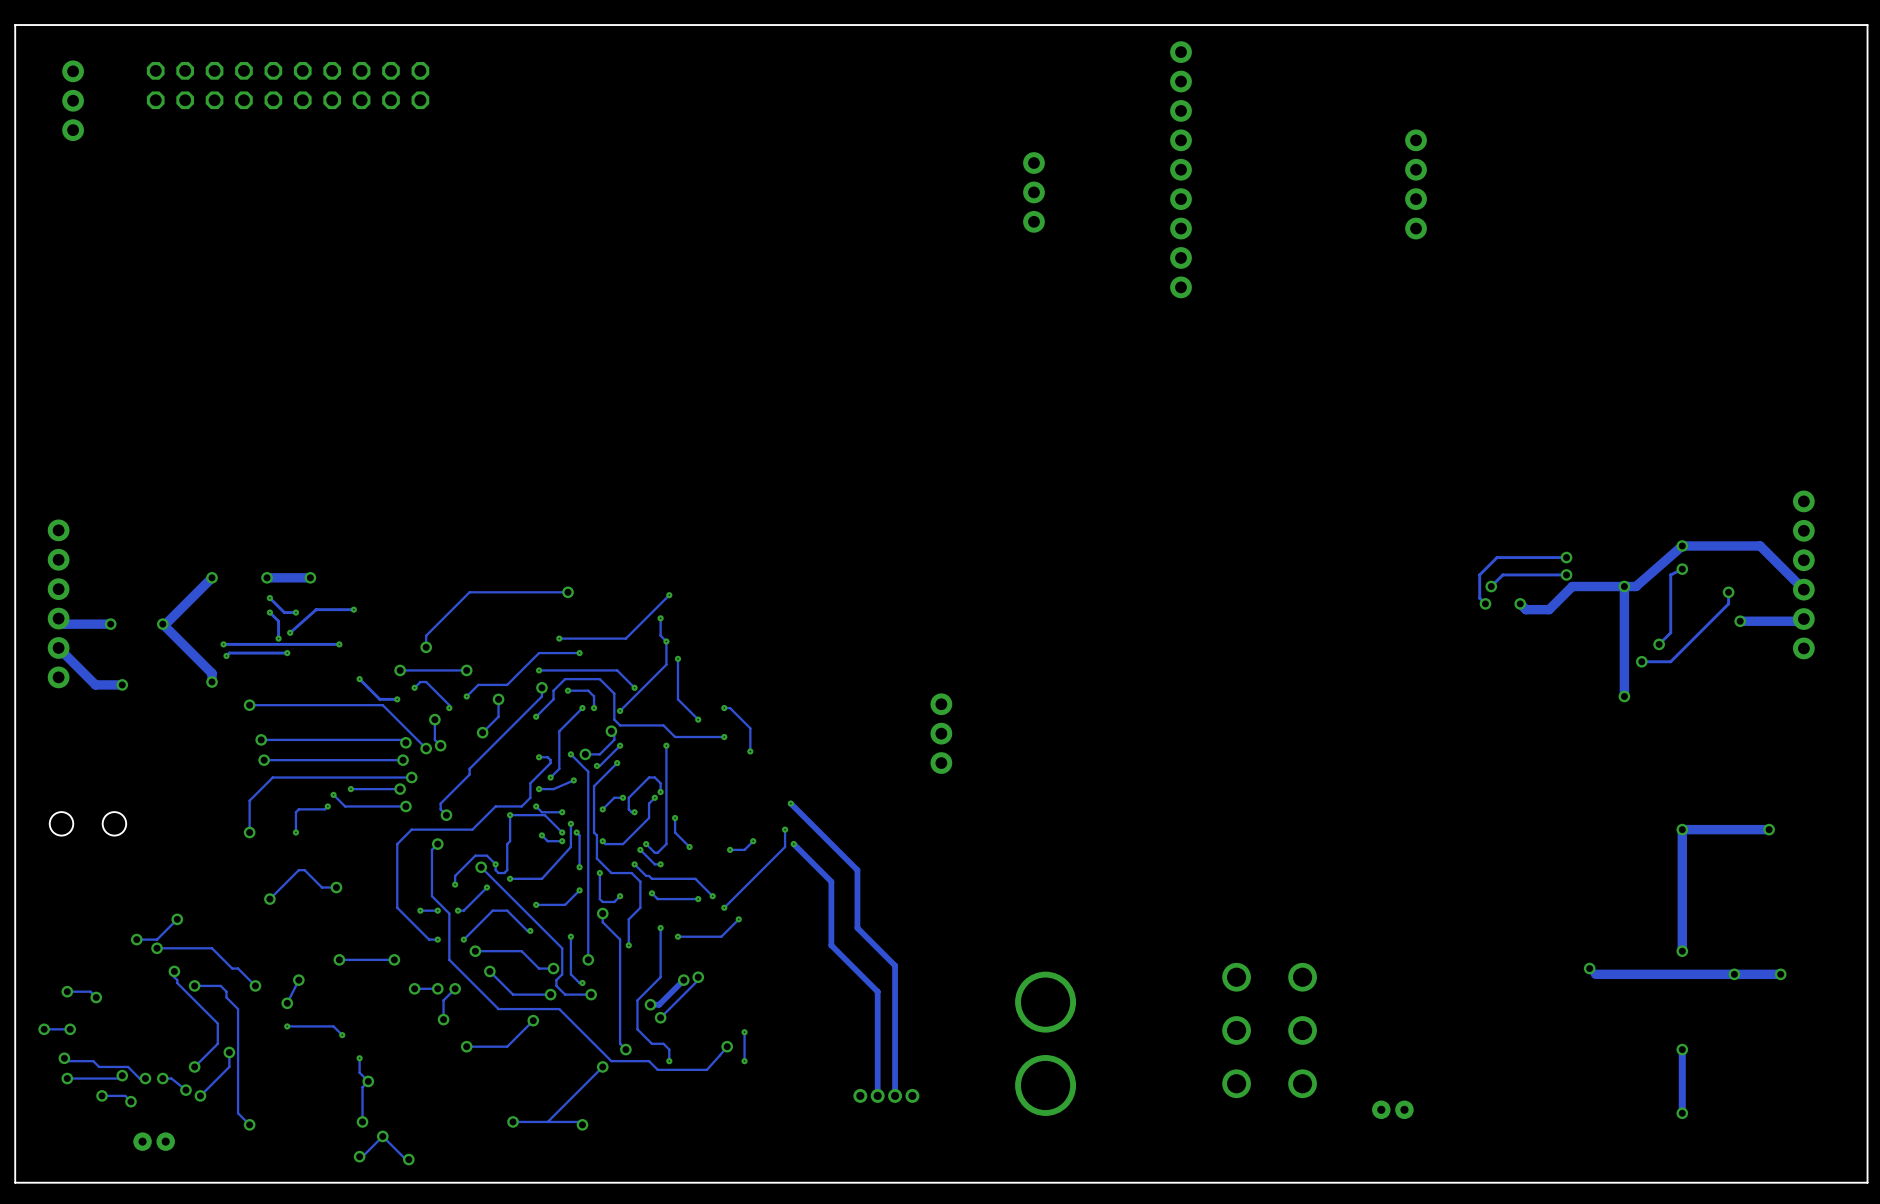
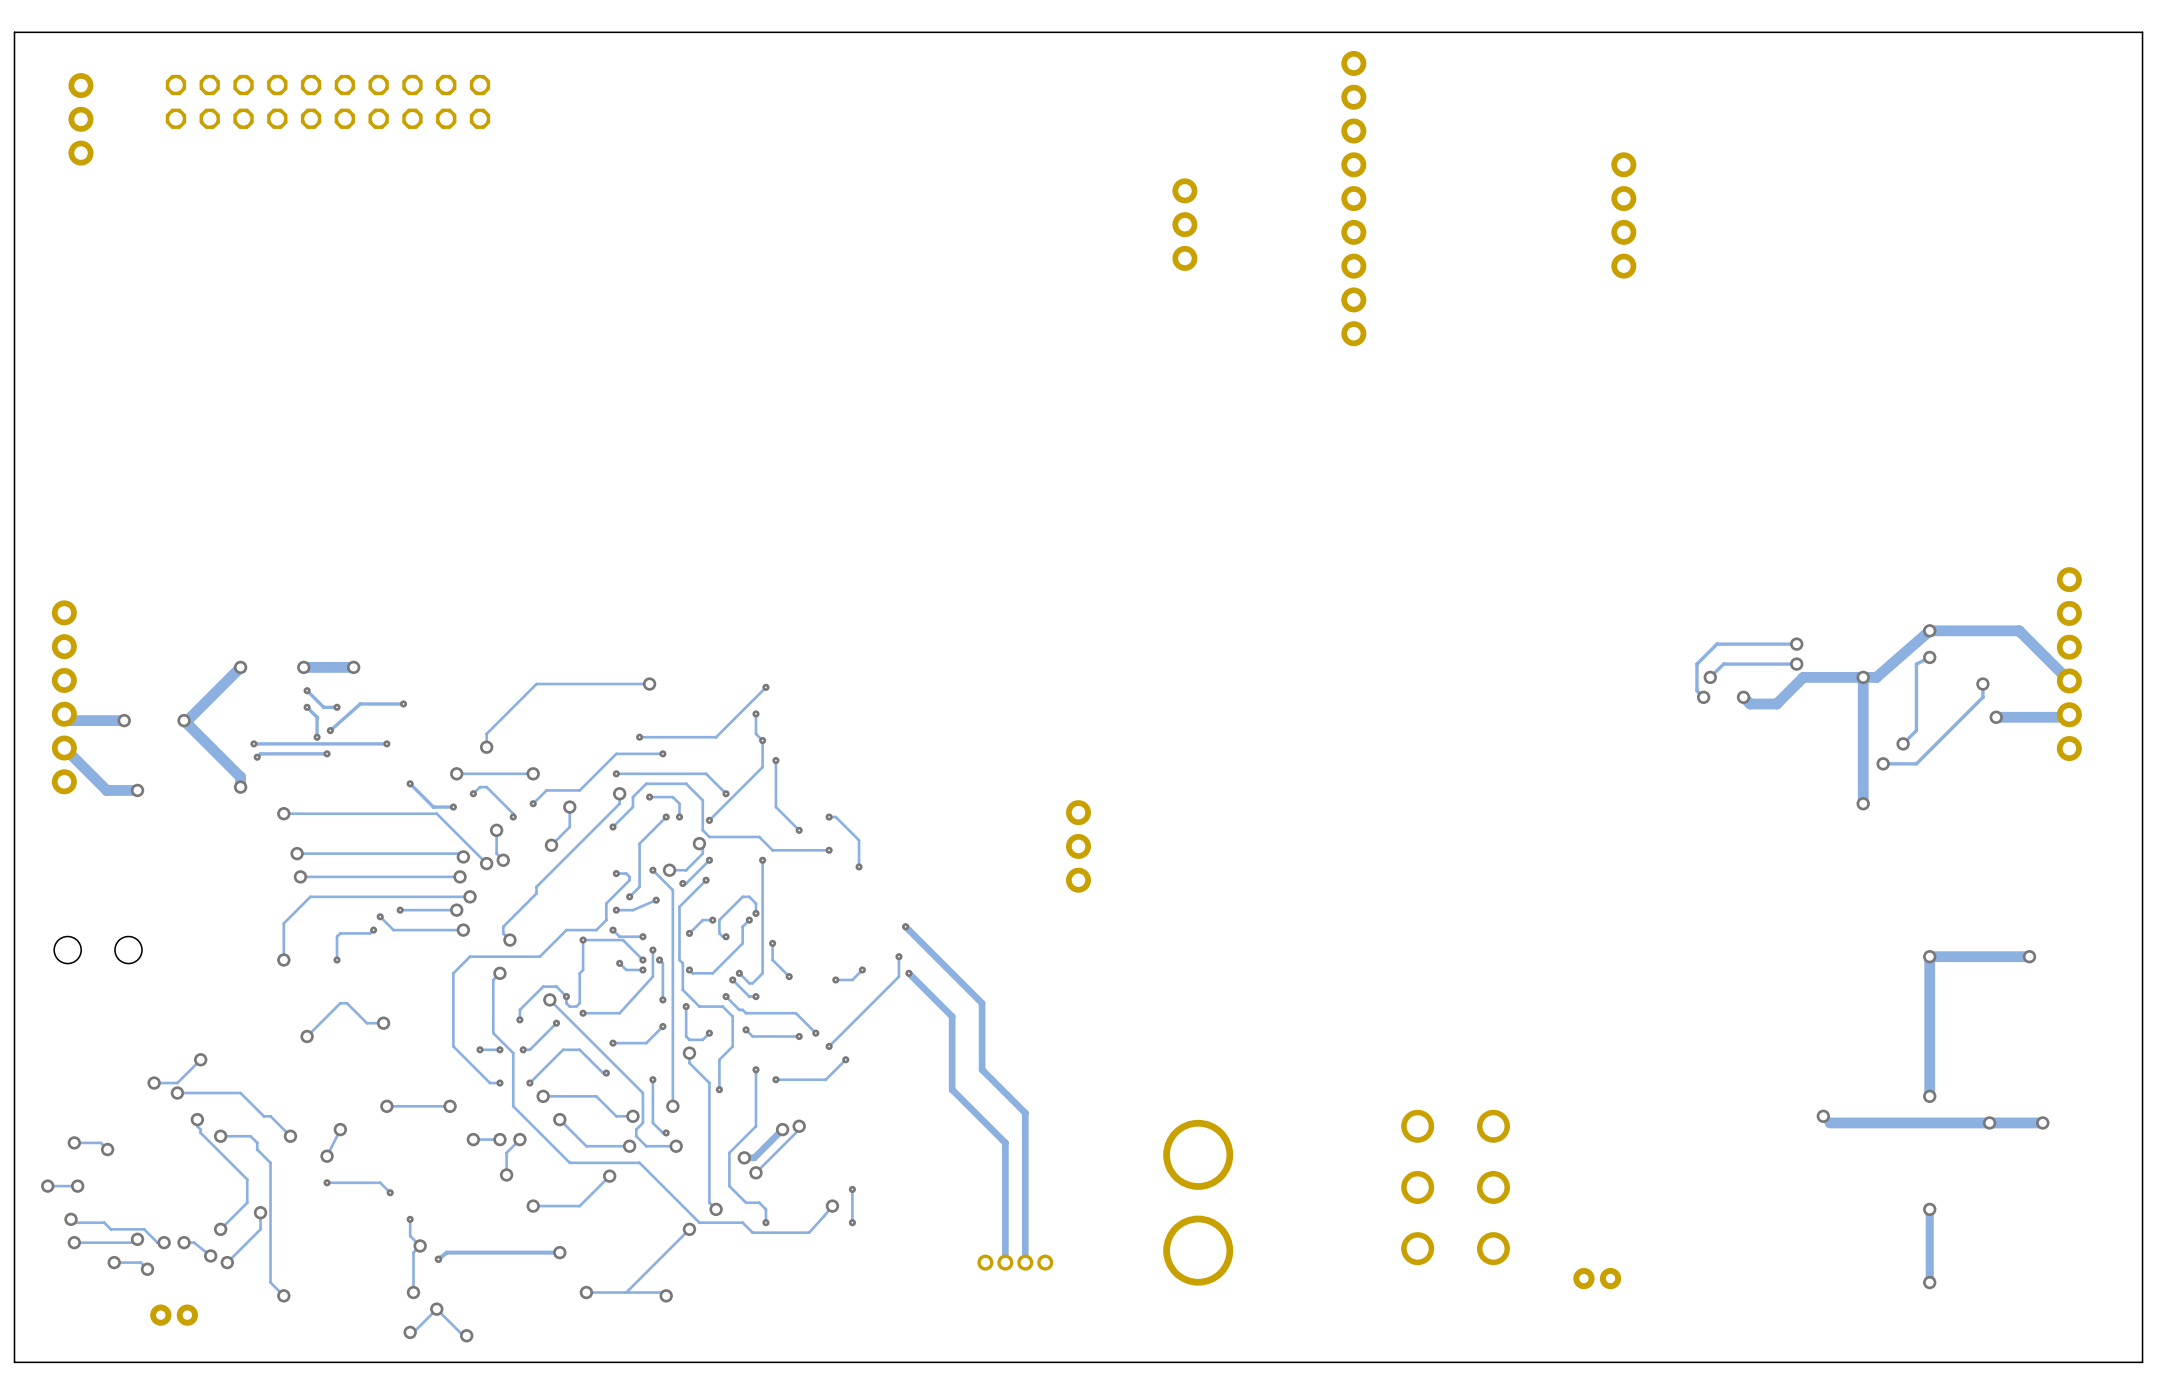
track: none -> (559, 1252) (446, 1252) (438, 1259)
via: none -> (559, 1252)
via: none -> (438, 1259)

